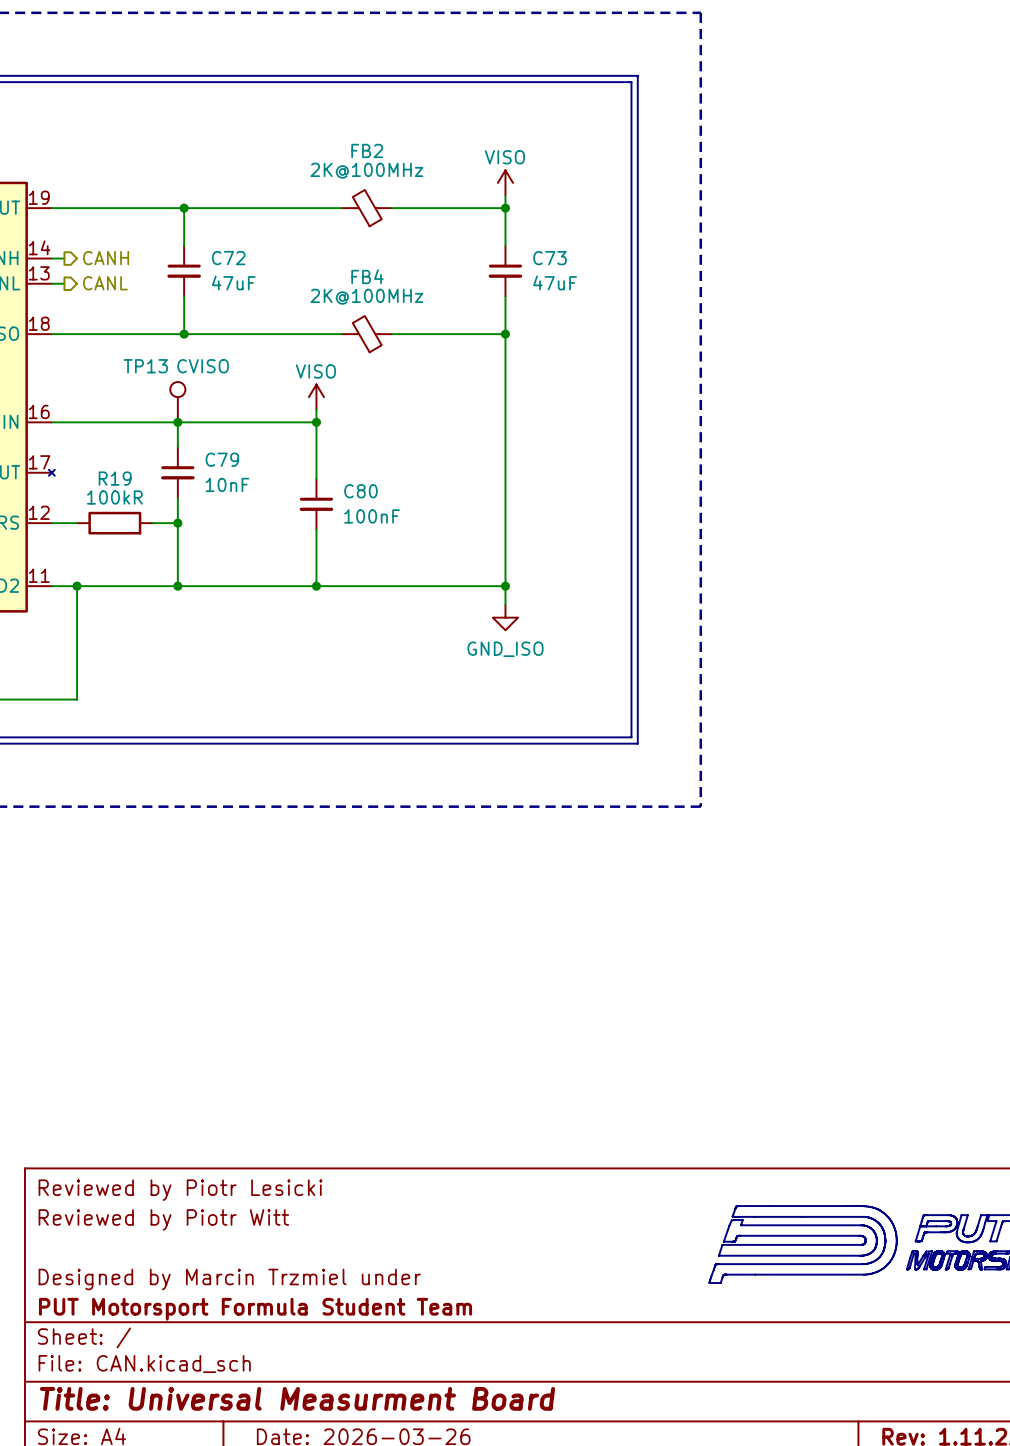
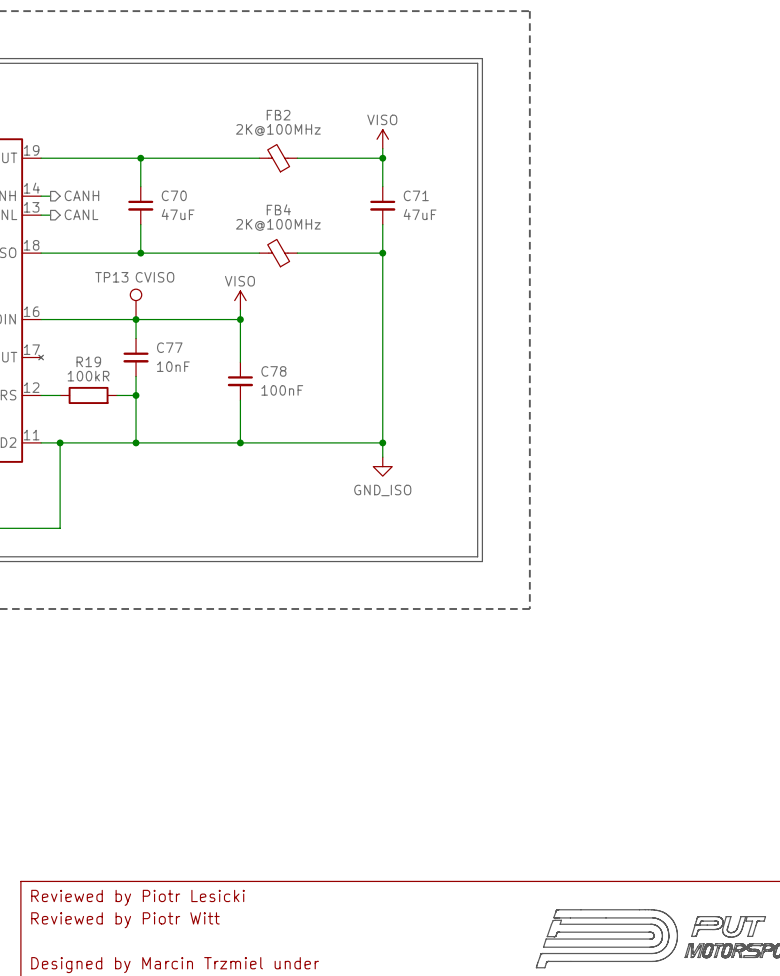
C72 name: C72 (228, 258) -> C70 (174, 195)
C73 name: C73 (549, 258) -> C71 (416, 195)
C79 name: C79 (222, 459) -> C77 (169, 347)
C80 name: C80 (360, 491) -> C78 (273, 371)

